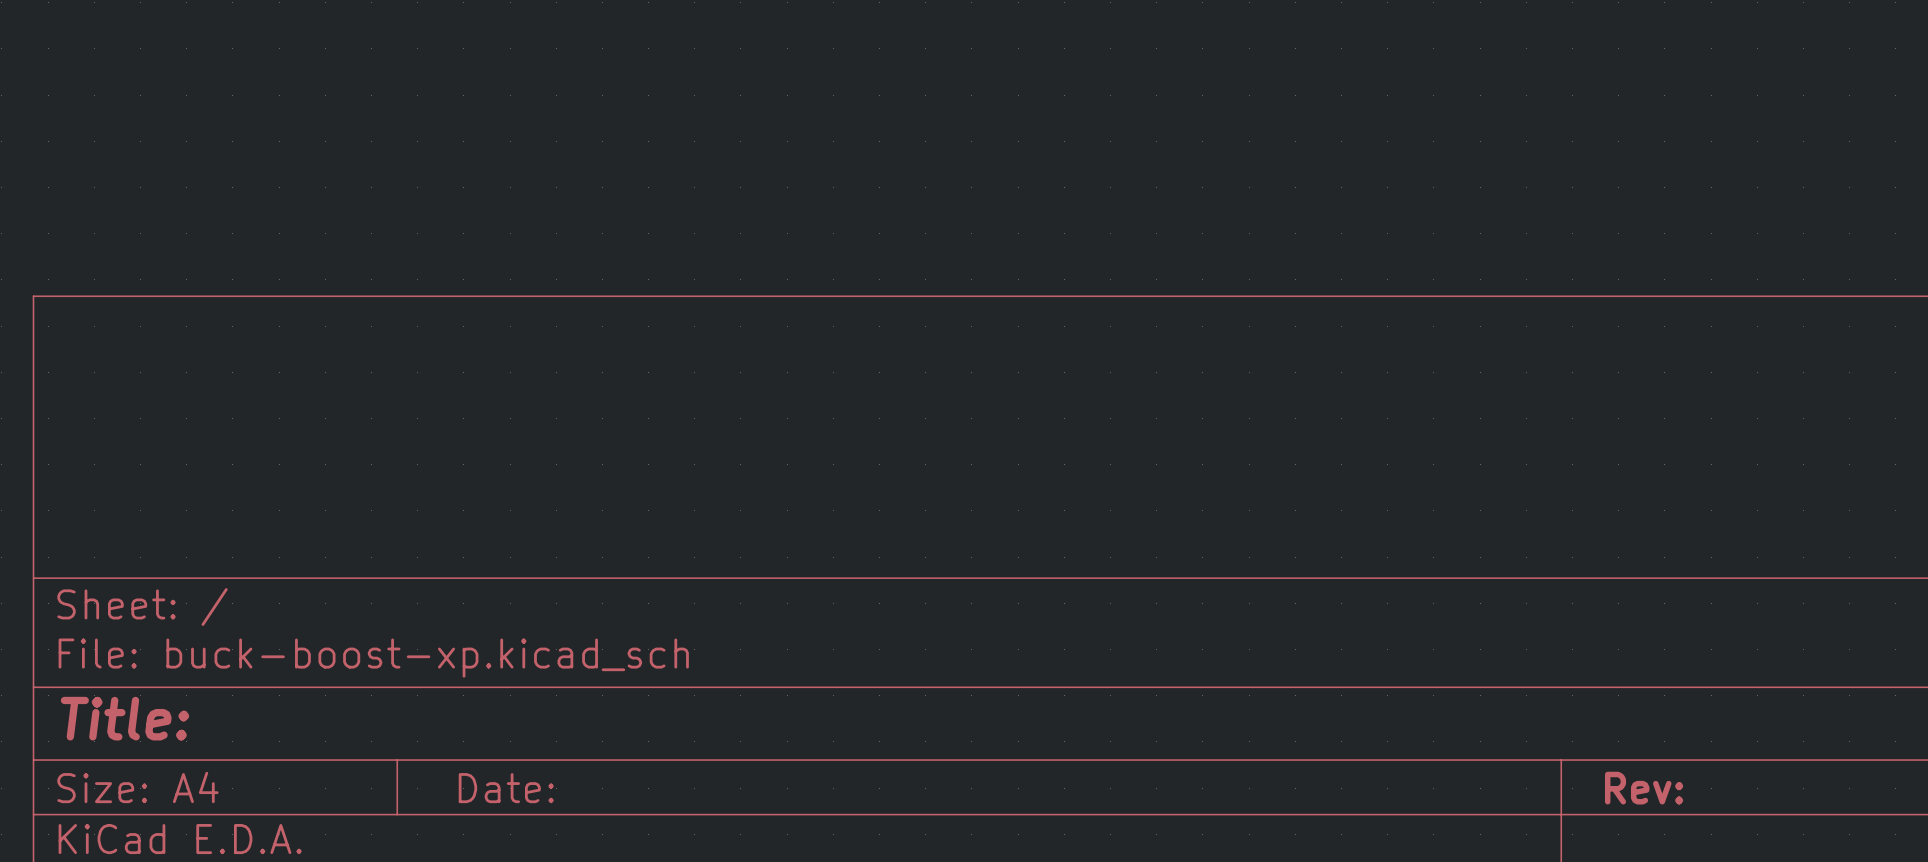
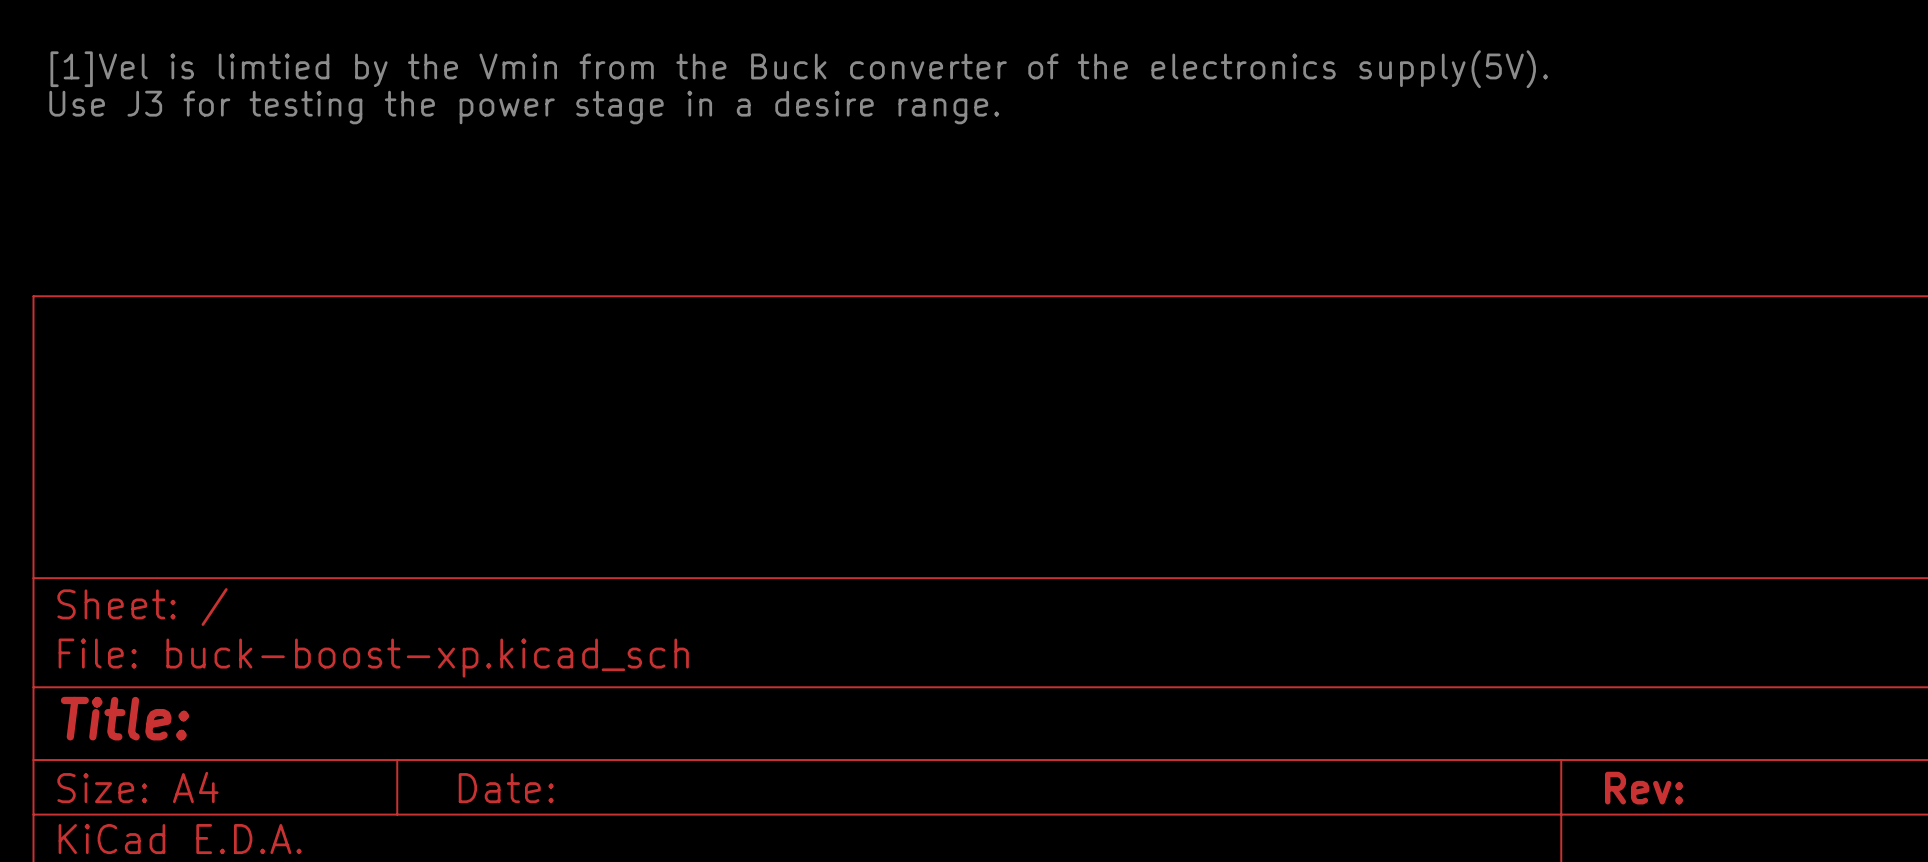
text: none -> [1]Vel is limtied by the Vmin from the Buck converter of the electronics supply(5V). (799, 69)
text: none -> Use J3 for testing the power stage in a desire range. (524, 107)

